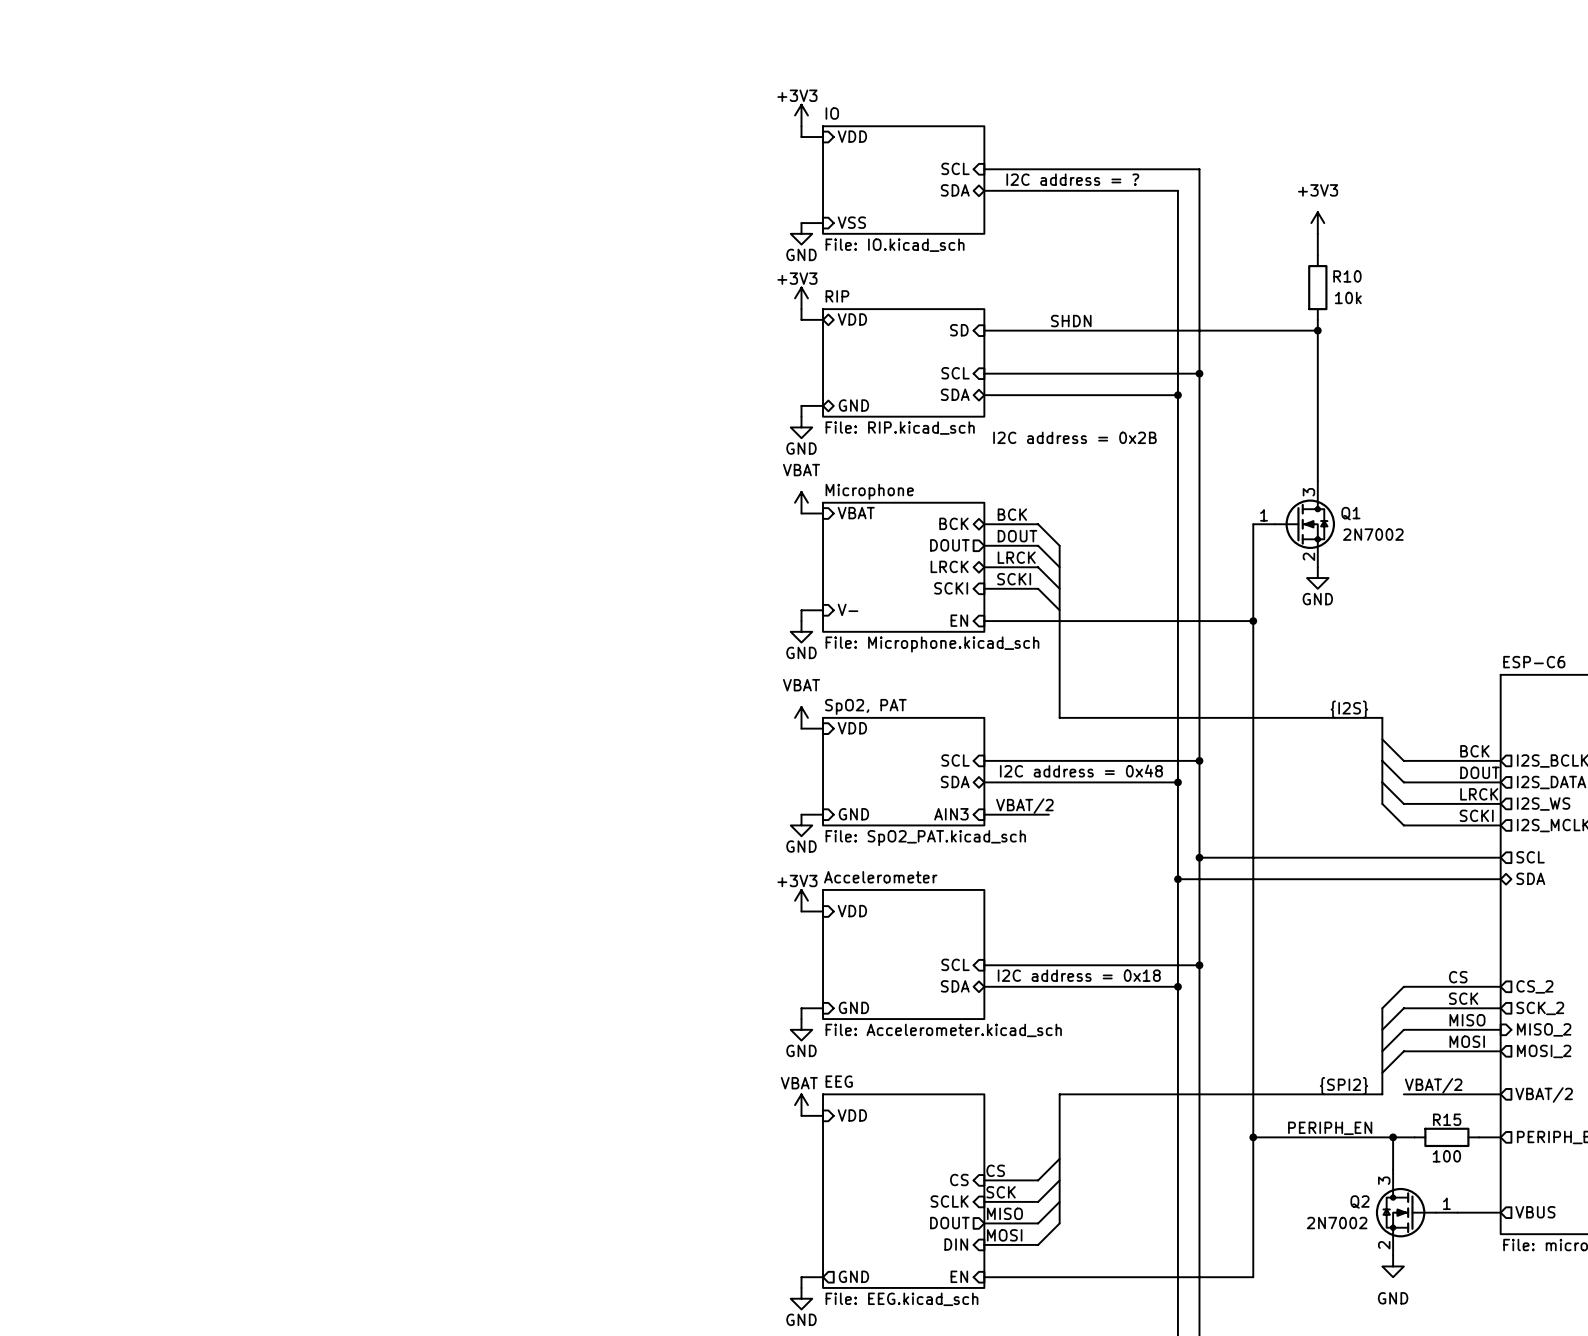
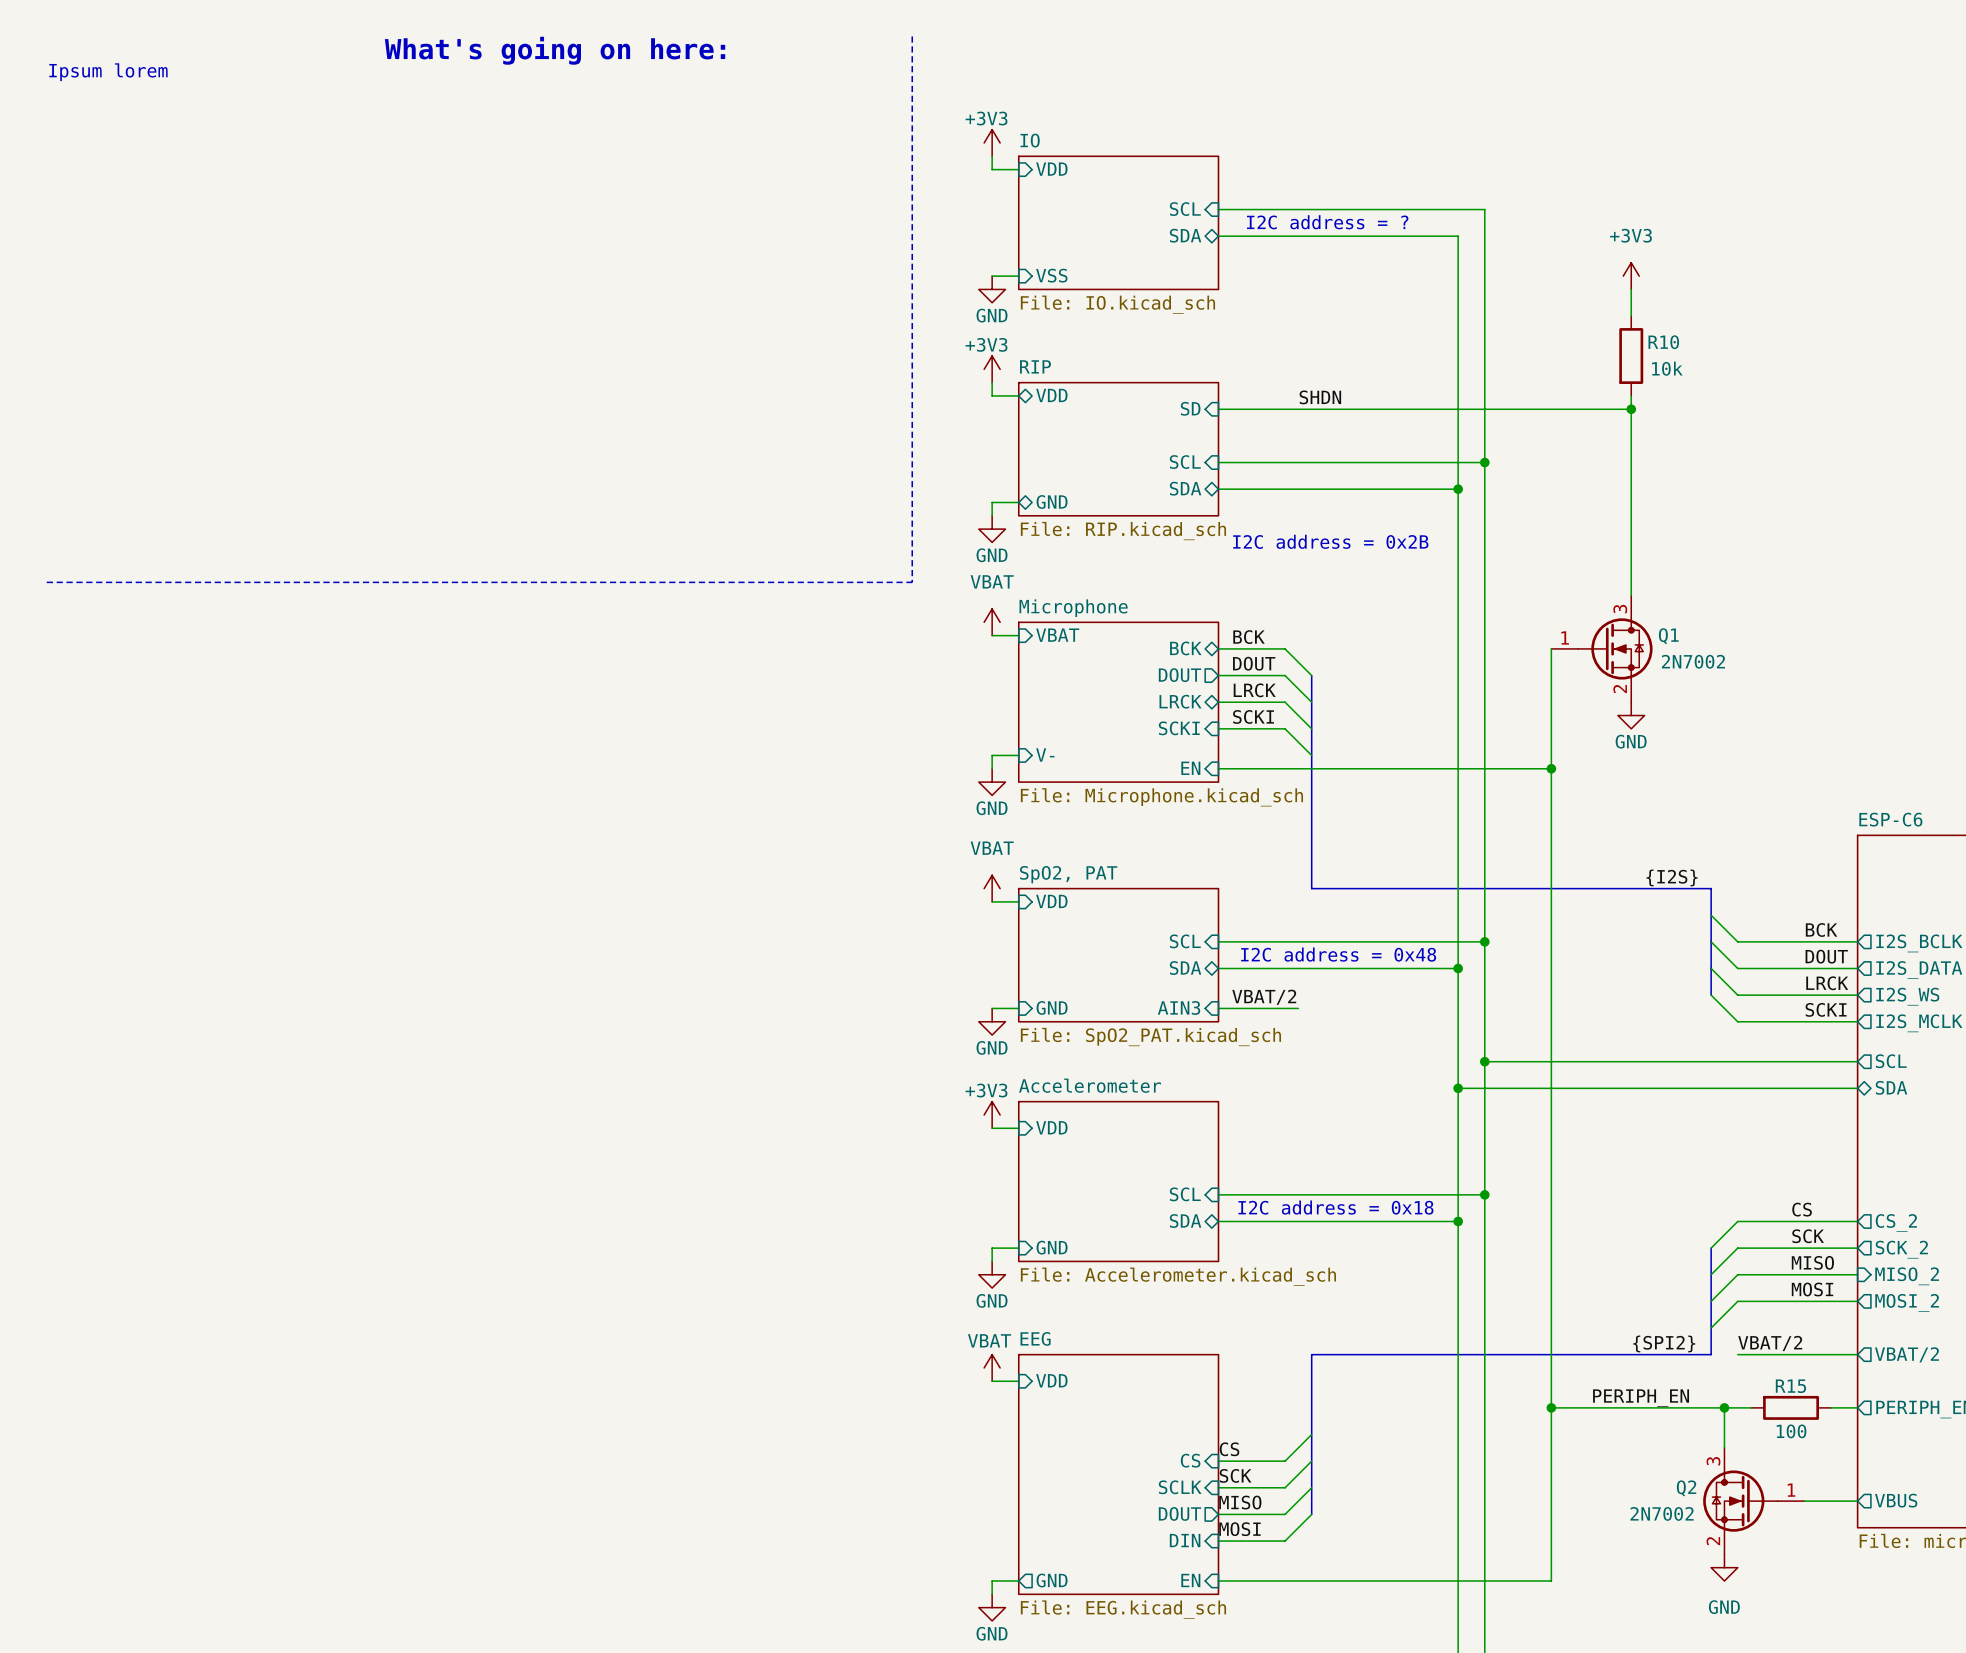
line: none -> (912, 36) (912, 582) (46, 582)
text: none -> What's going on here: (555, 50)
text: none -> Ipsum lorem (108, 72)

